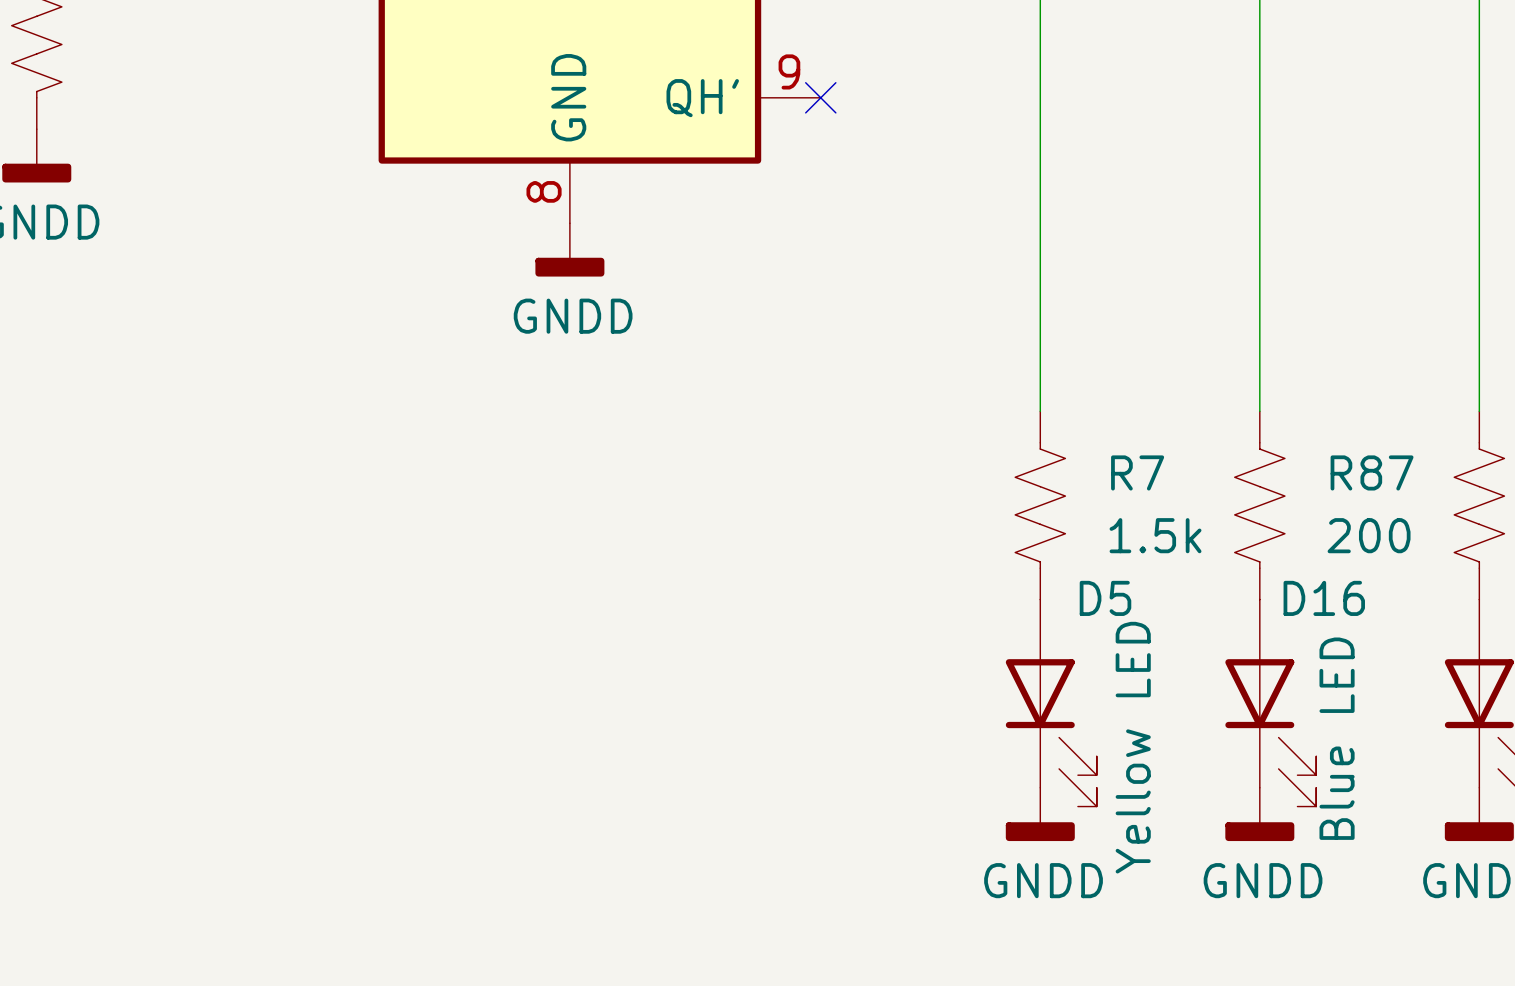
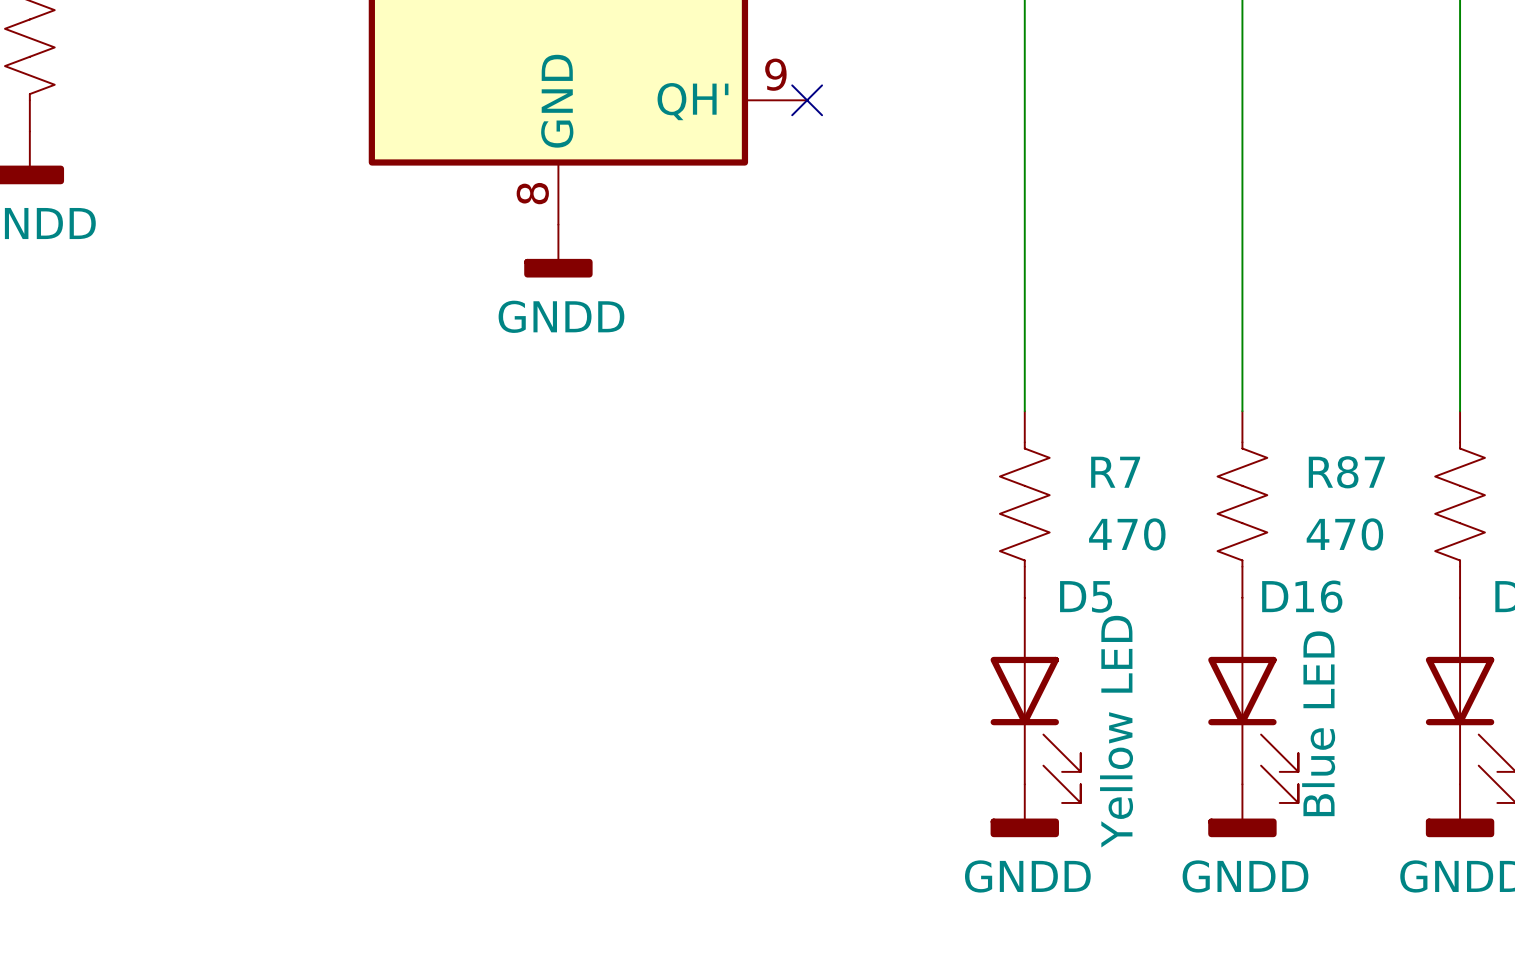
R7 value: 1.5k (1155, 535) -> 470 (1127, 534)
R87 value: 200 (1369, 535) -> 470 (1344, 534)

